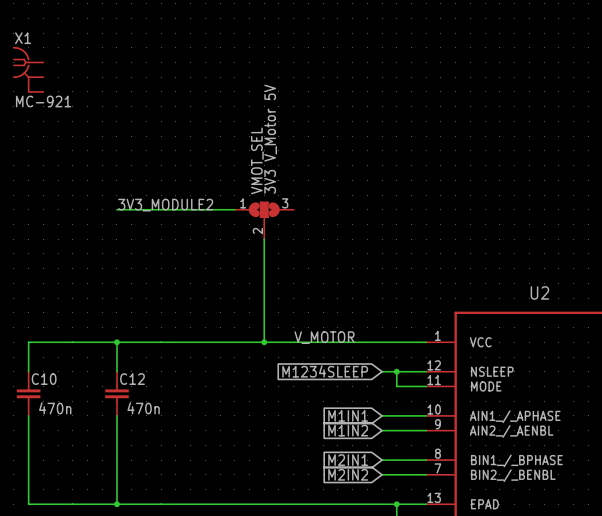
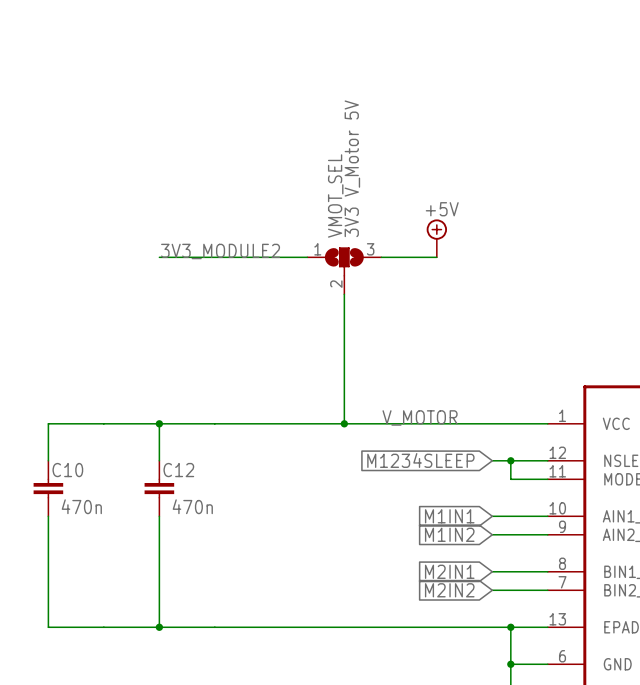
X1: MC-921 (28, 69) -> none
power symbol: none -> +5V (436, 238)
wire: none -> (381, 257) (436, 257)

